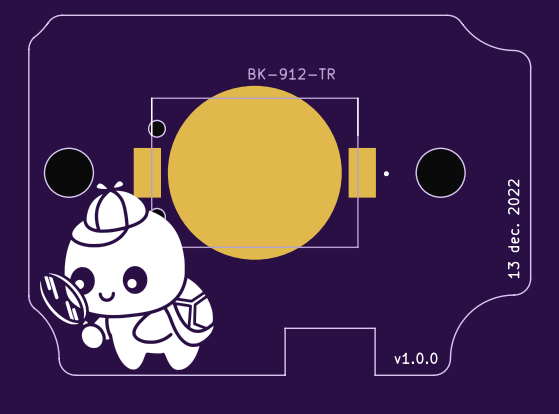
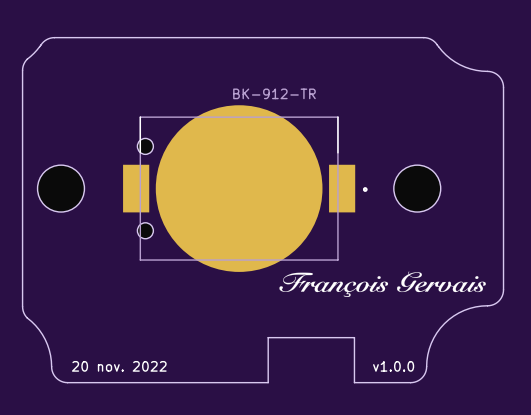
drawing: [40, 181, 214, 370] -> none
text: 13 dec. 2022 (513, 228) -> none
drawing: none -> [279, 271, 486, 297]
text: none -> 20 nov. 2022 (119, 366)

